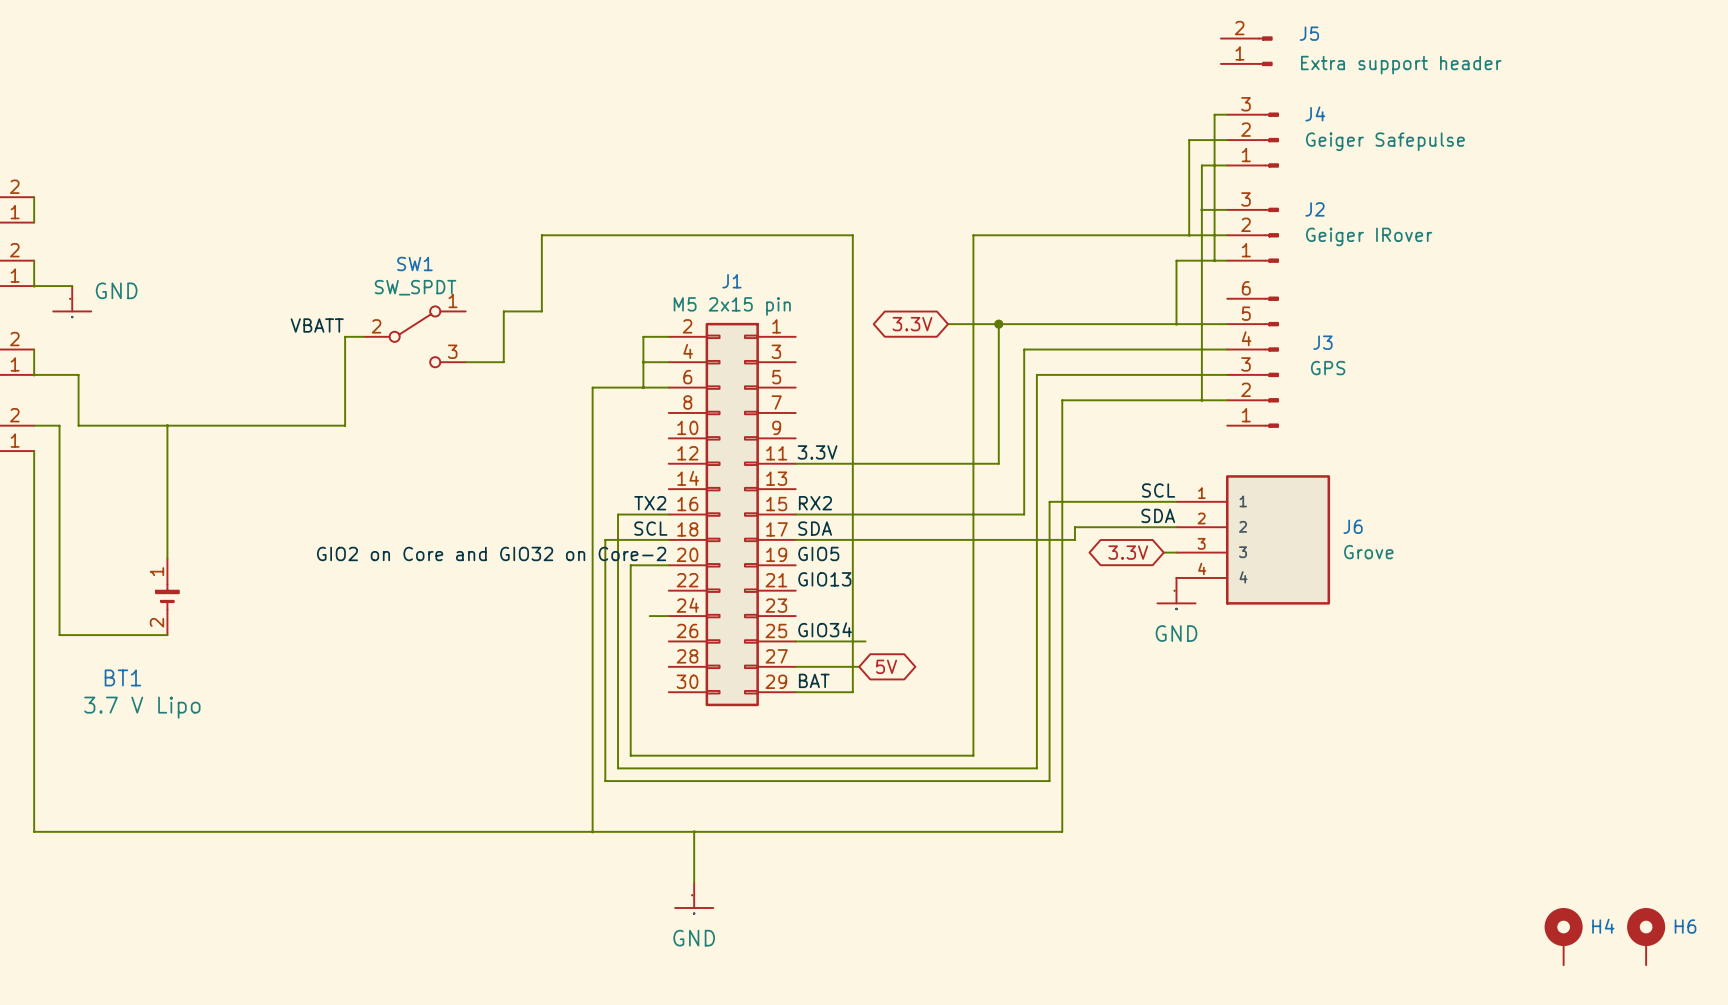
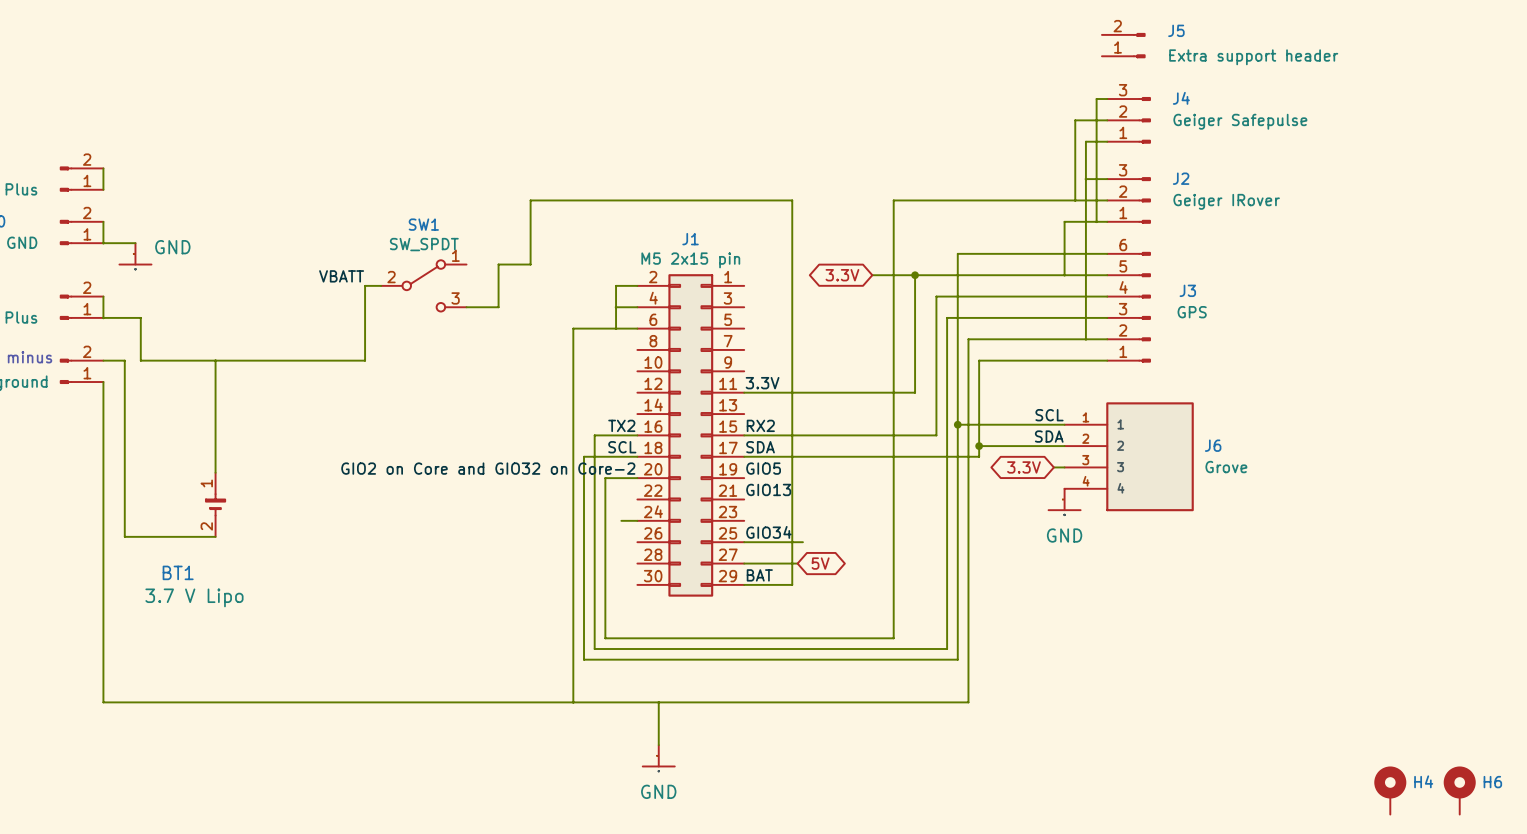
wire: none -> (1107, 253) (957, 253) (957, 424)
wire: none -> (1107, 360) (979, 360) (979, 446)
junction: none -> (957, 424)
junction: none -> (979, 446)

